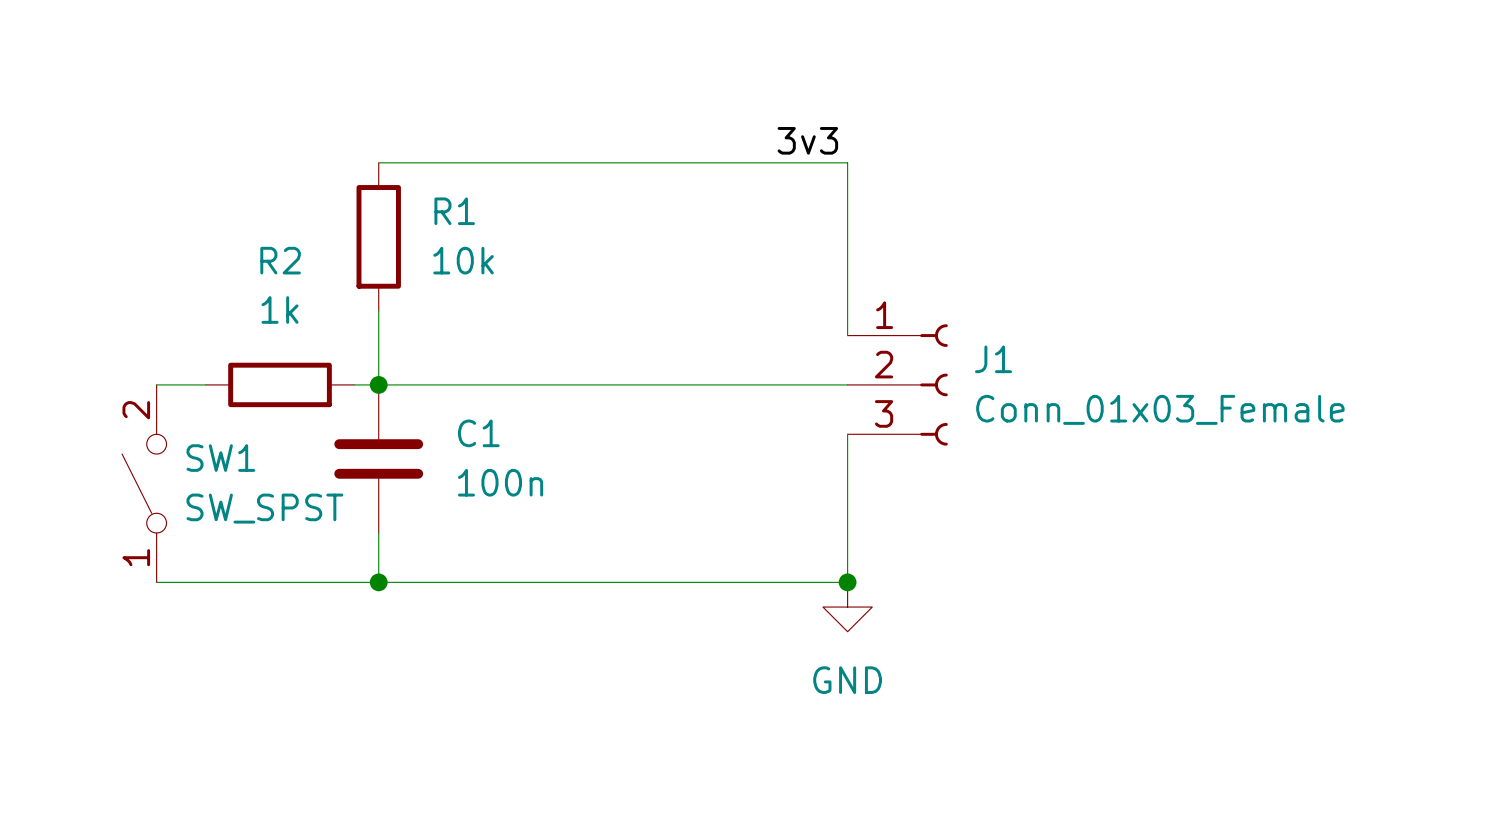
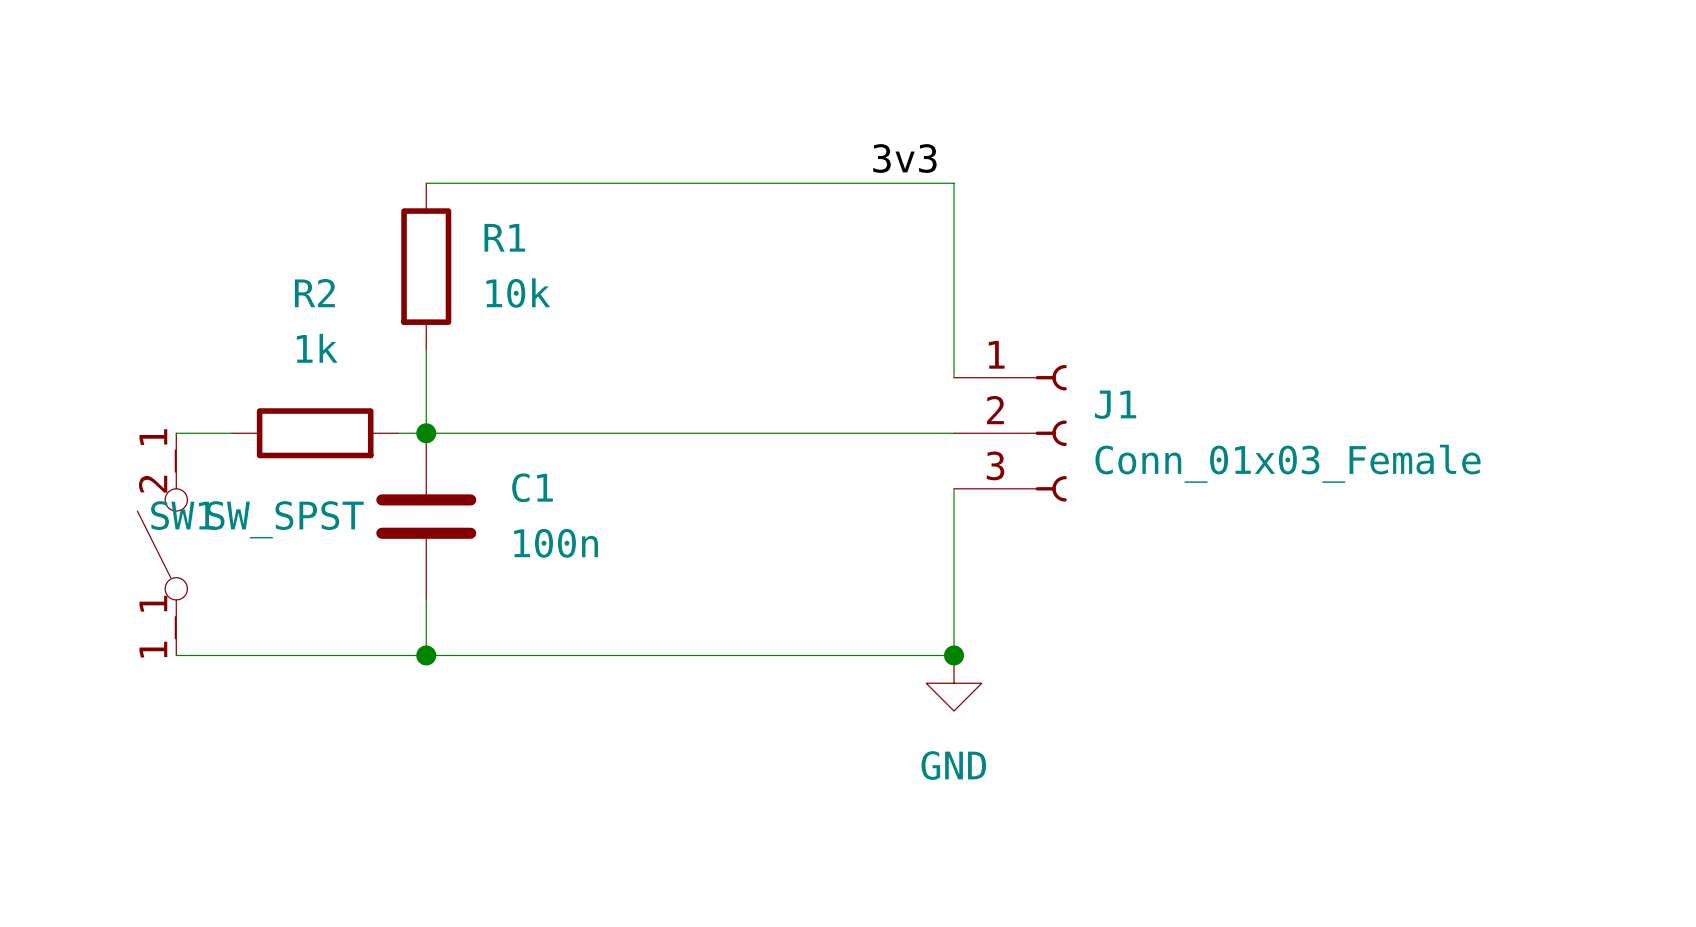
SW1 pin number: 2 (136, 410) -> 2_1 (157, 460)
SW1 name position: SW1 (220, 458) -> SW1 (182, 515)
SW1 value position: SW_SPST (264, 508) -> SW_SPST (285, 519)
SW1 pin number: 1 (136, 557) -> 1_1 (157, 626)

